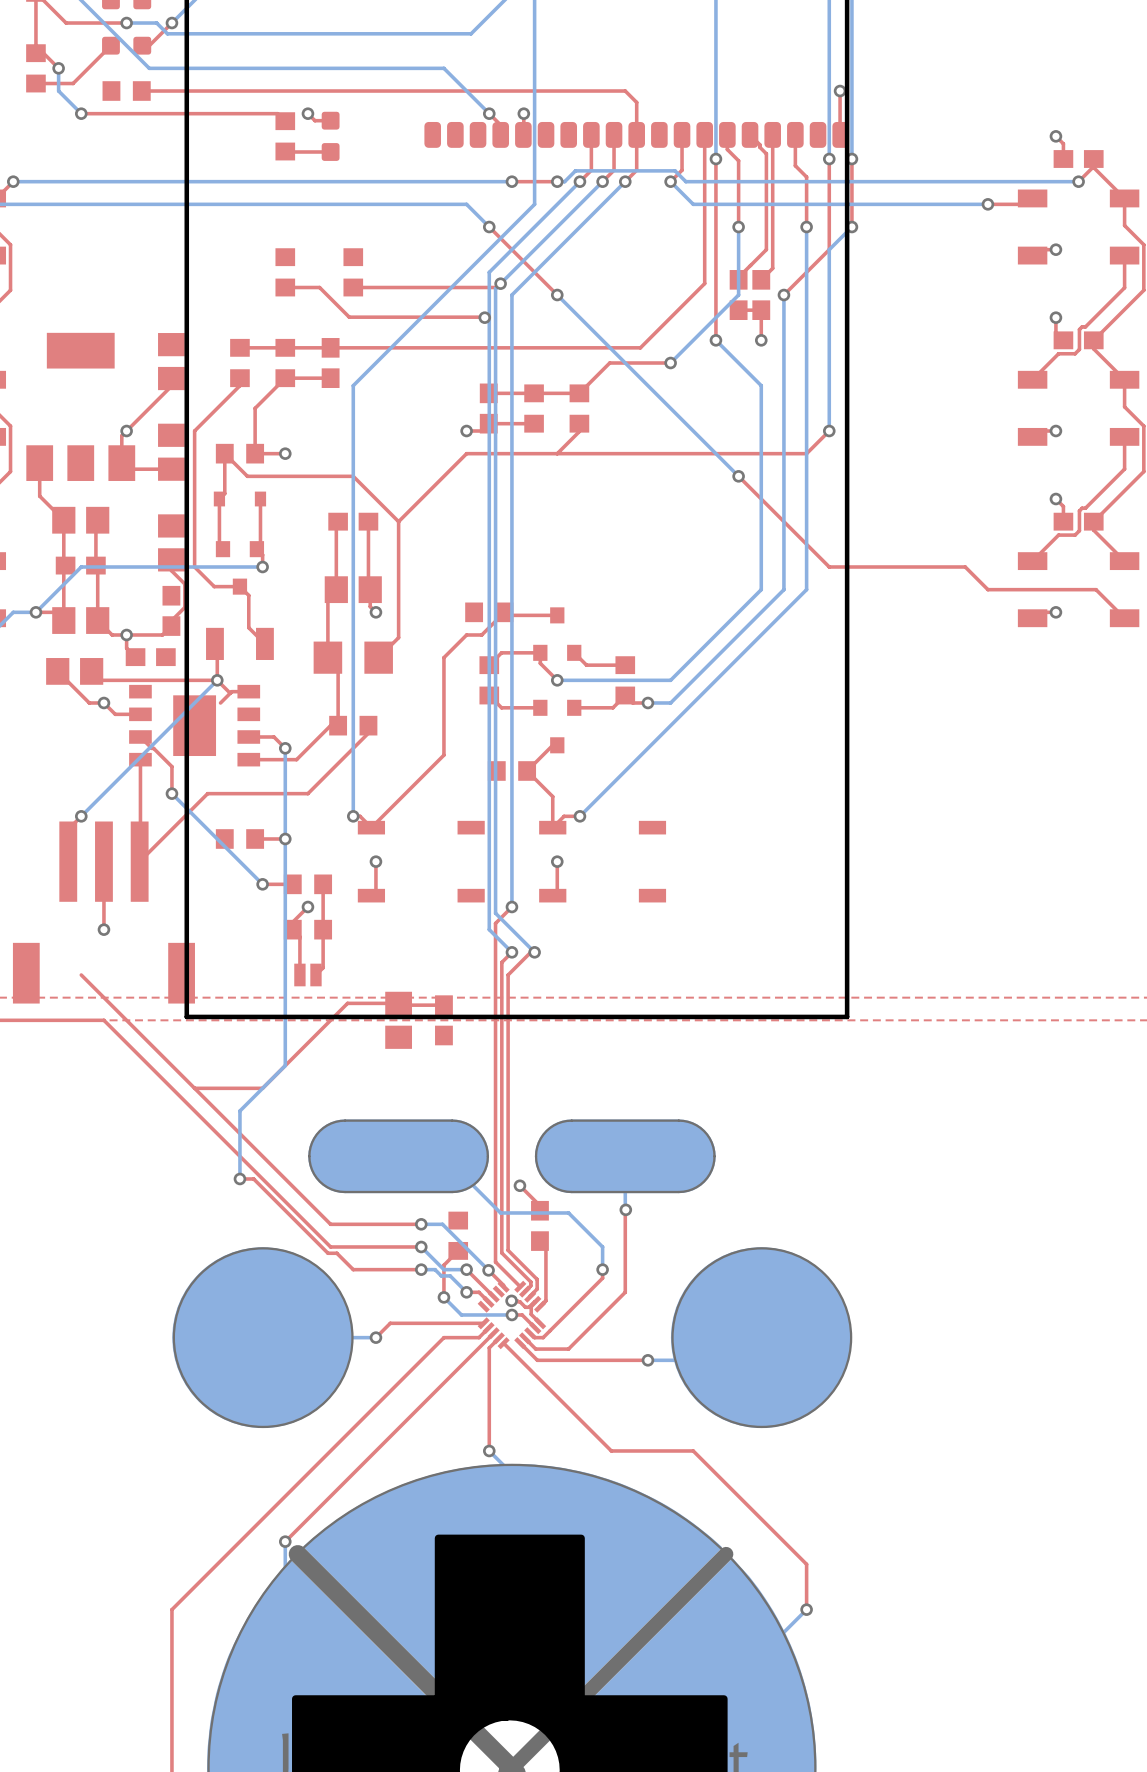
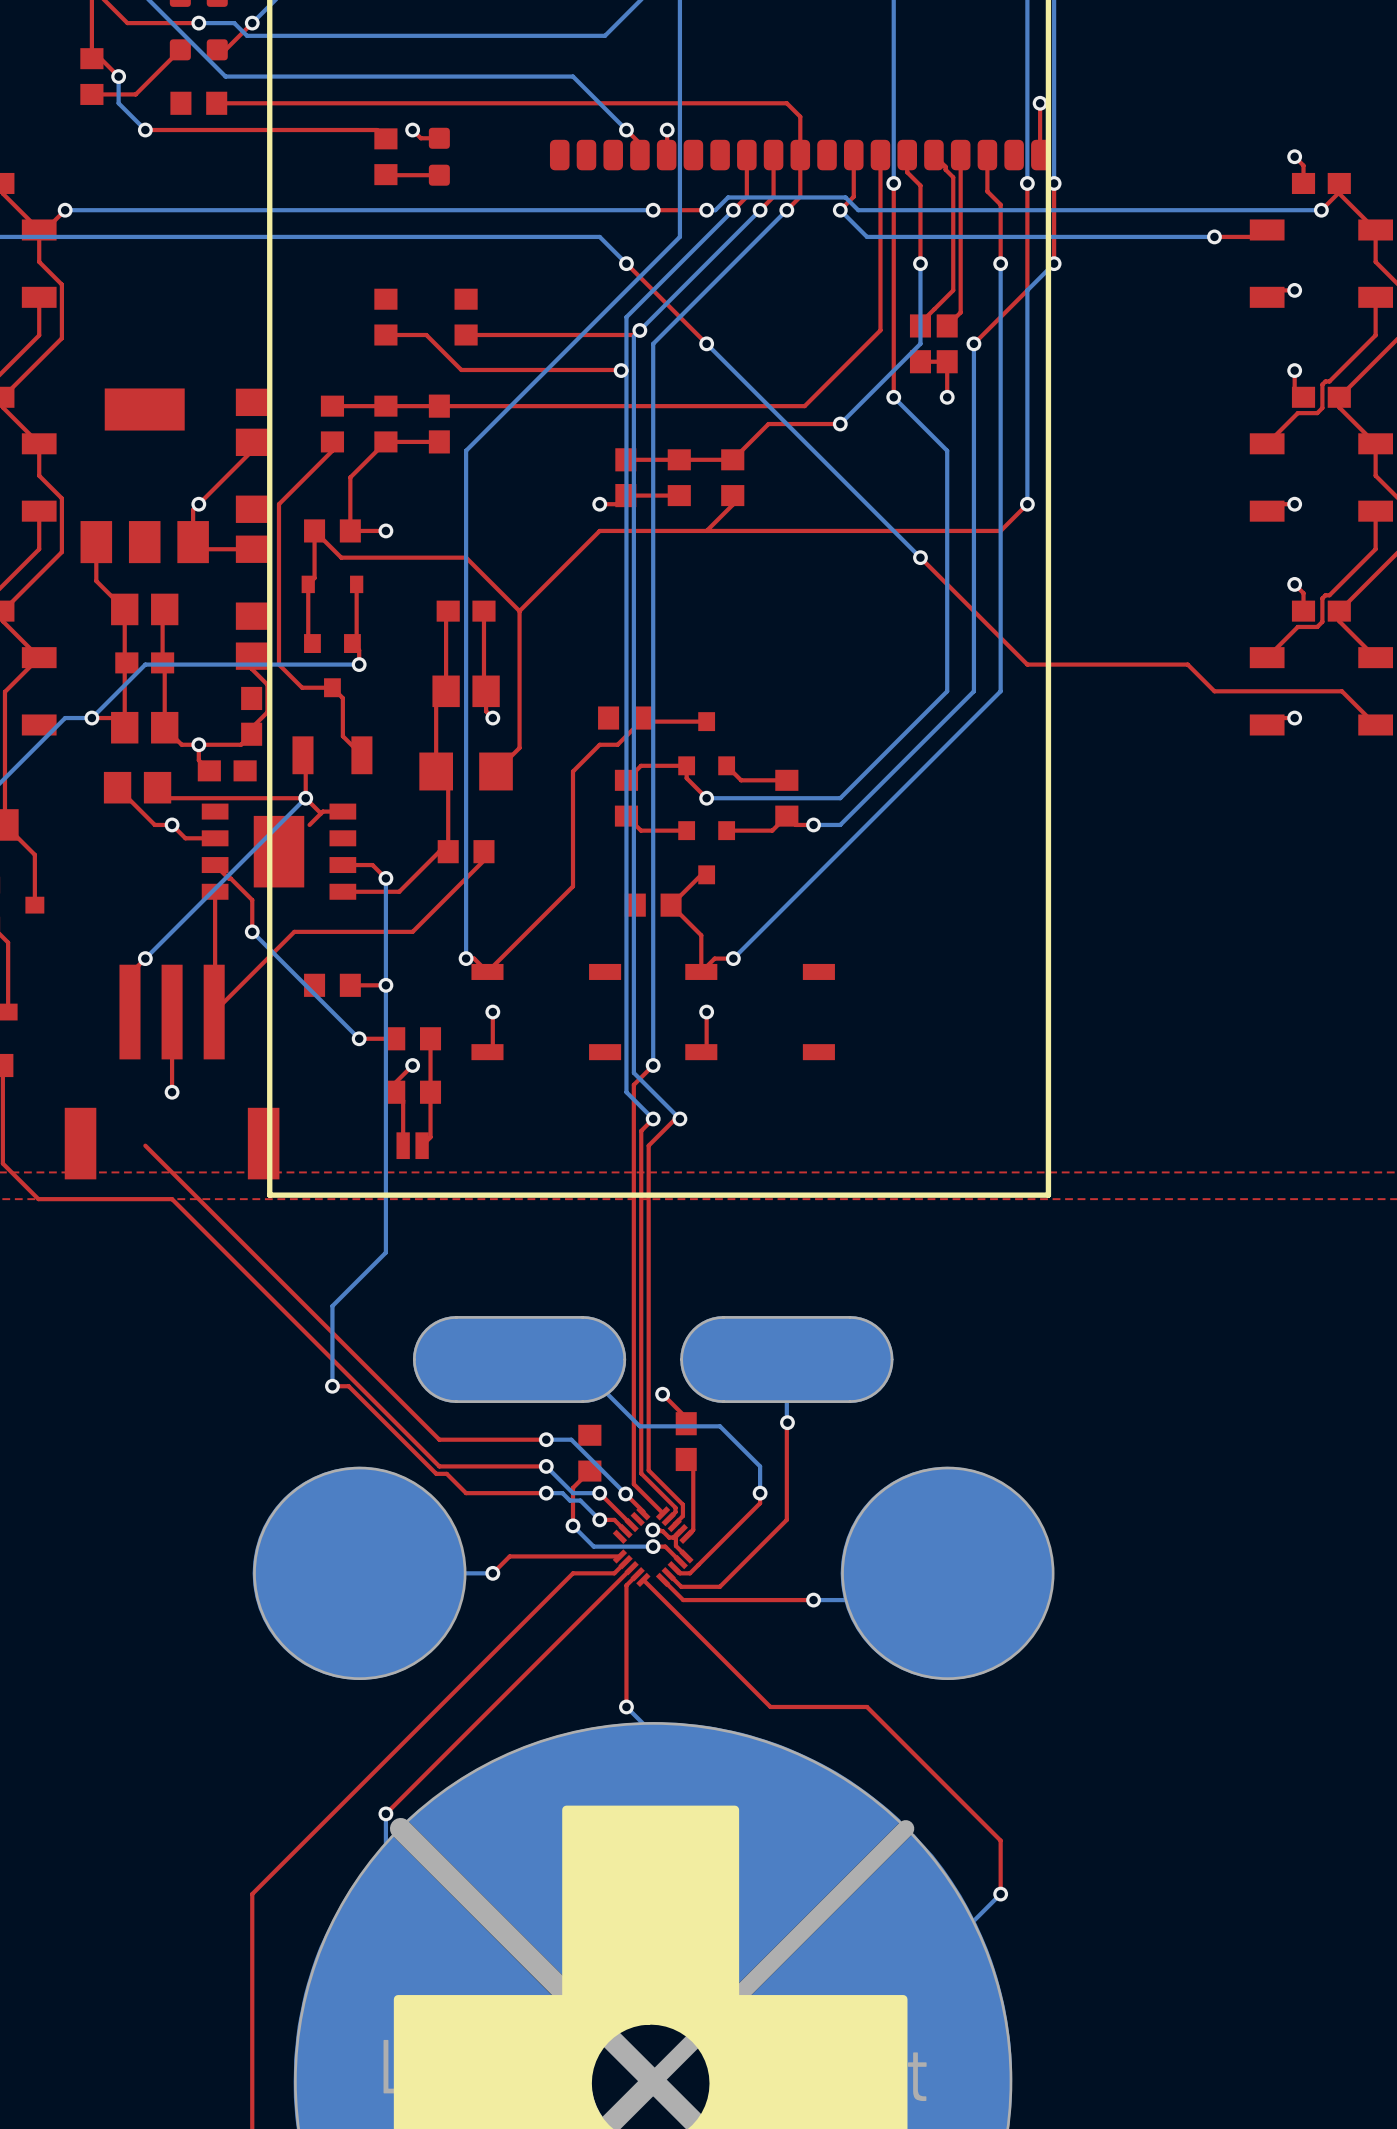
top track: (443, 1005) (347, 1003) (262, 1088) (194, 1088) -> none
part: (398, 1020) -> none
part: (443, 1020) -> none

